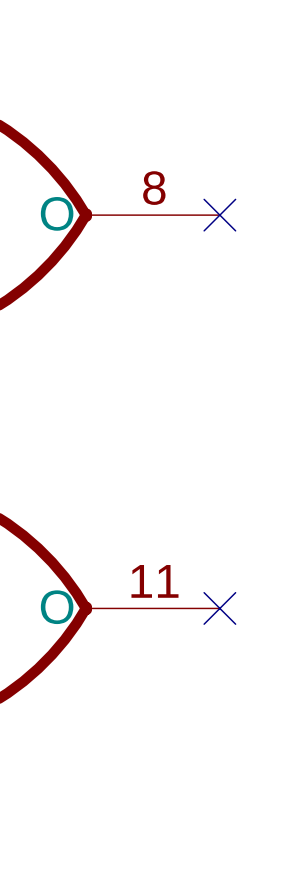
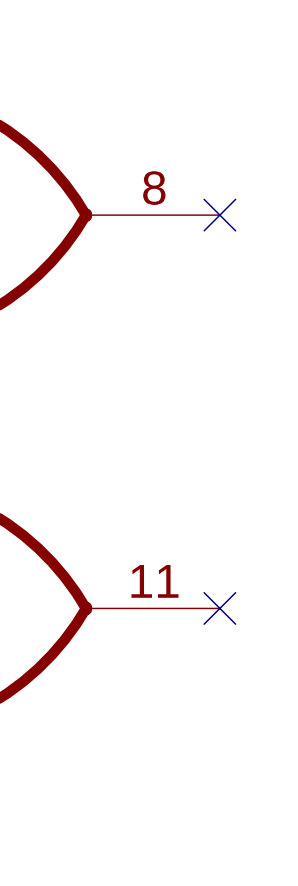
part pin name: O (57, 213) -> none
part pin name: O (57, 607) -> none

